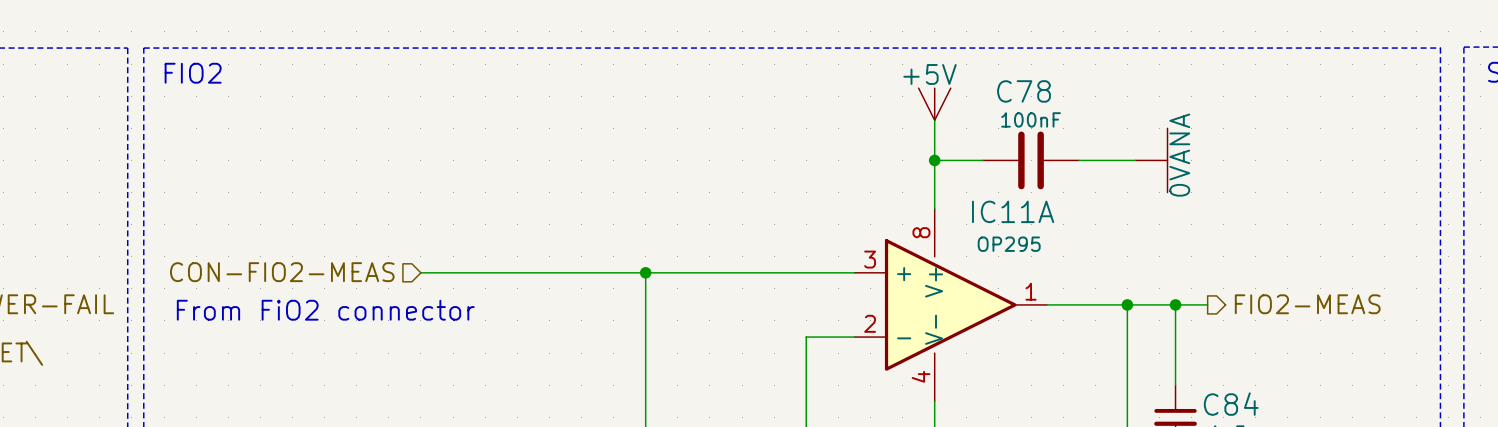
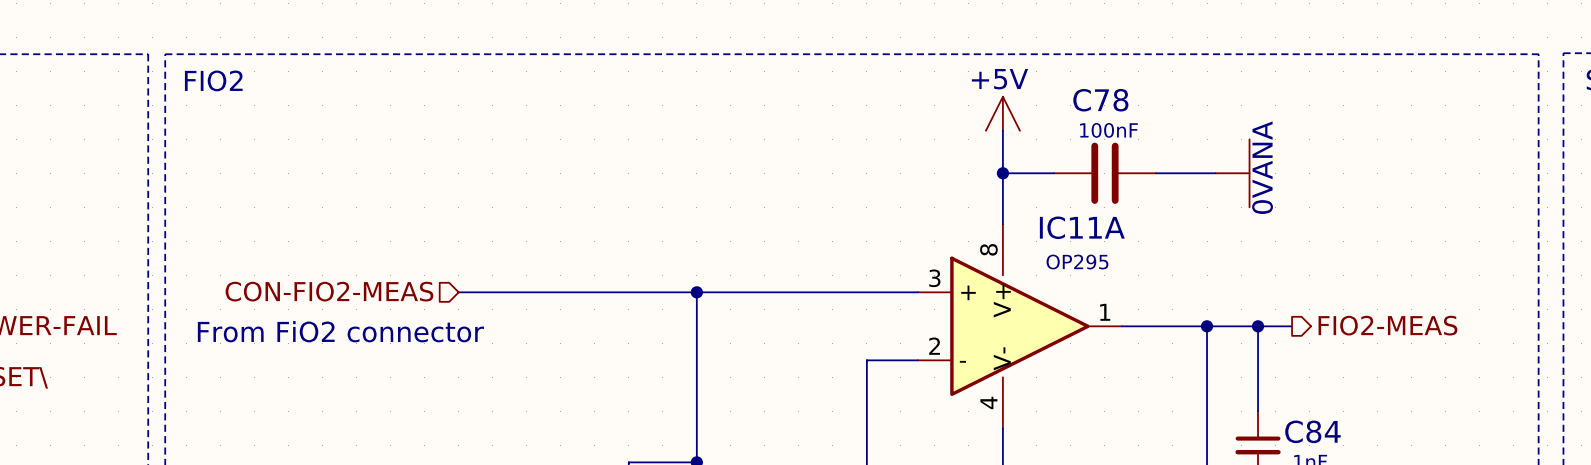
power symbol rotation: 0° (934, 104) -> 180° (1002, 113)

